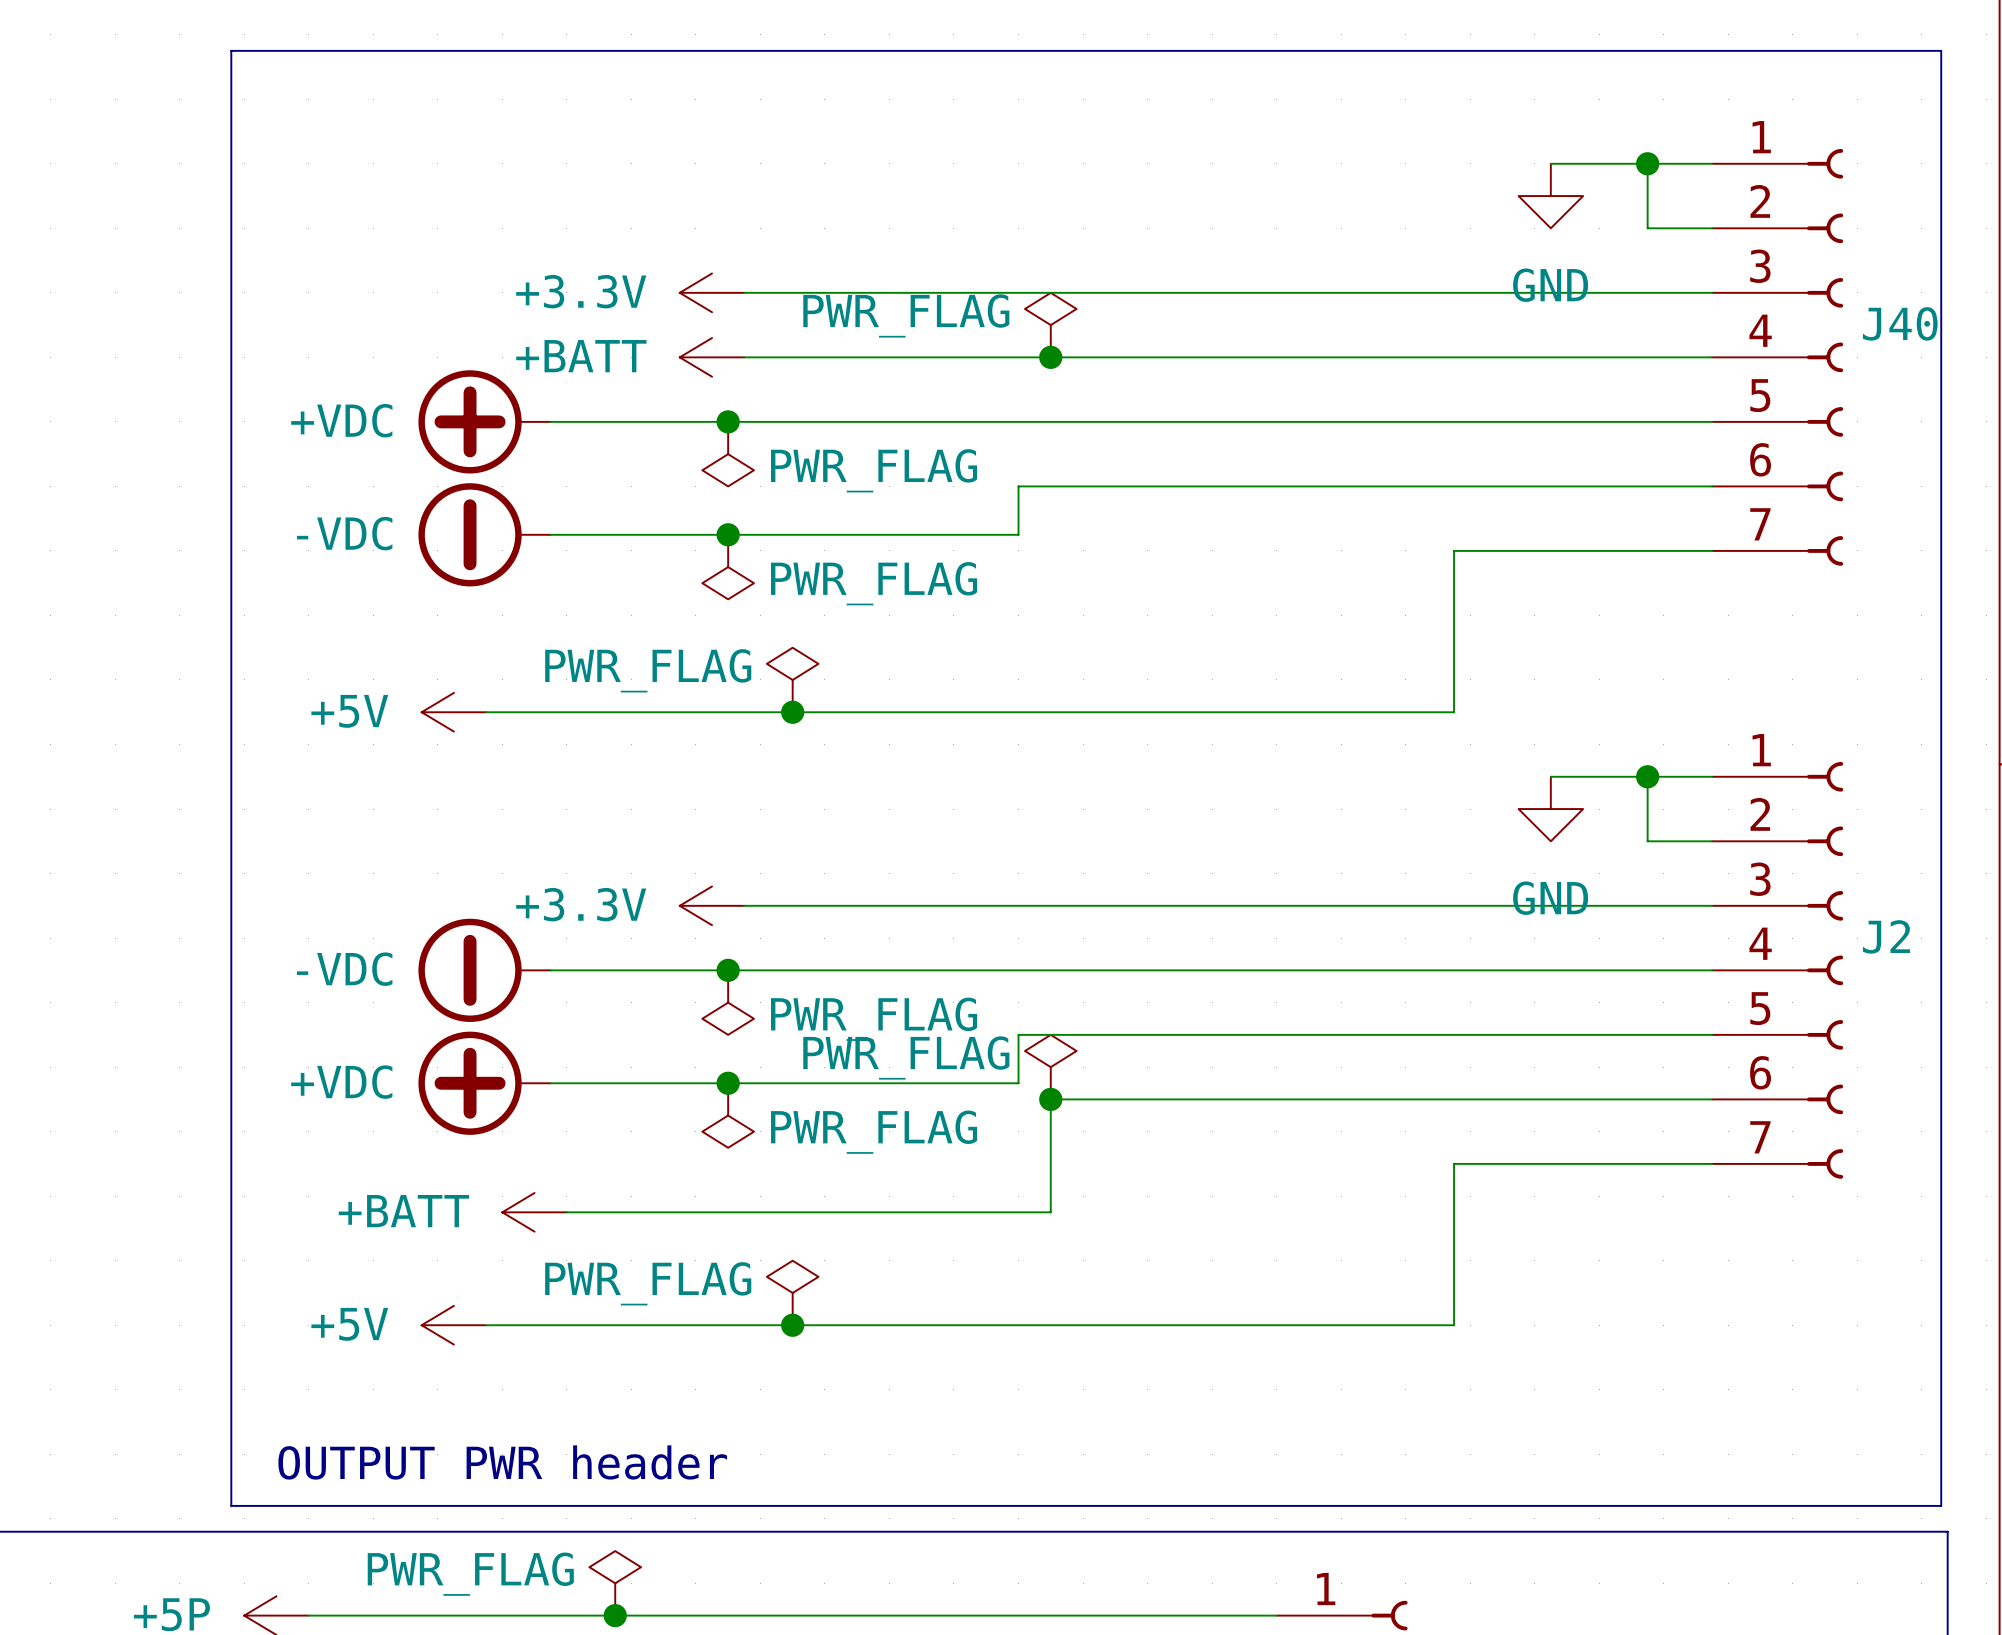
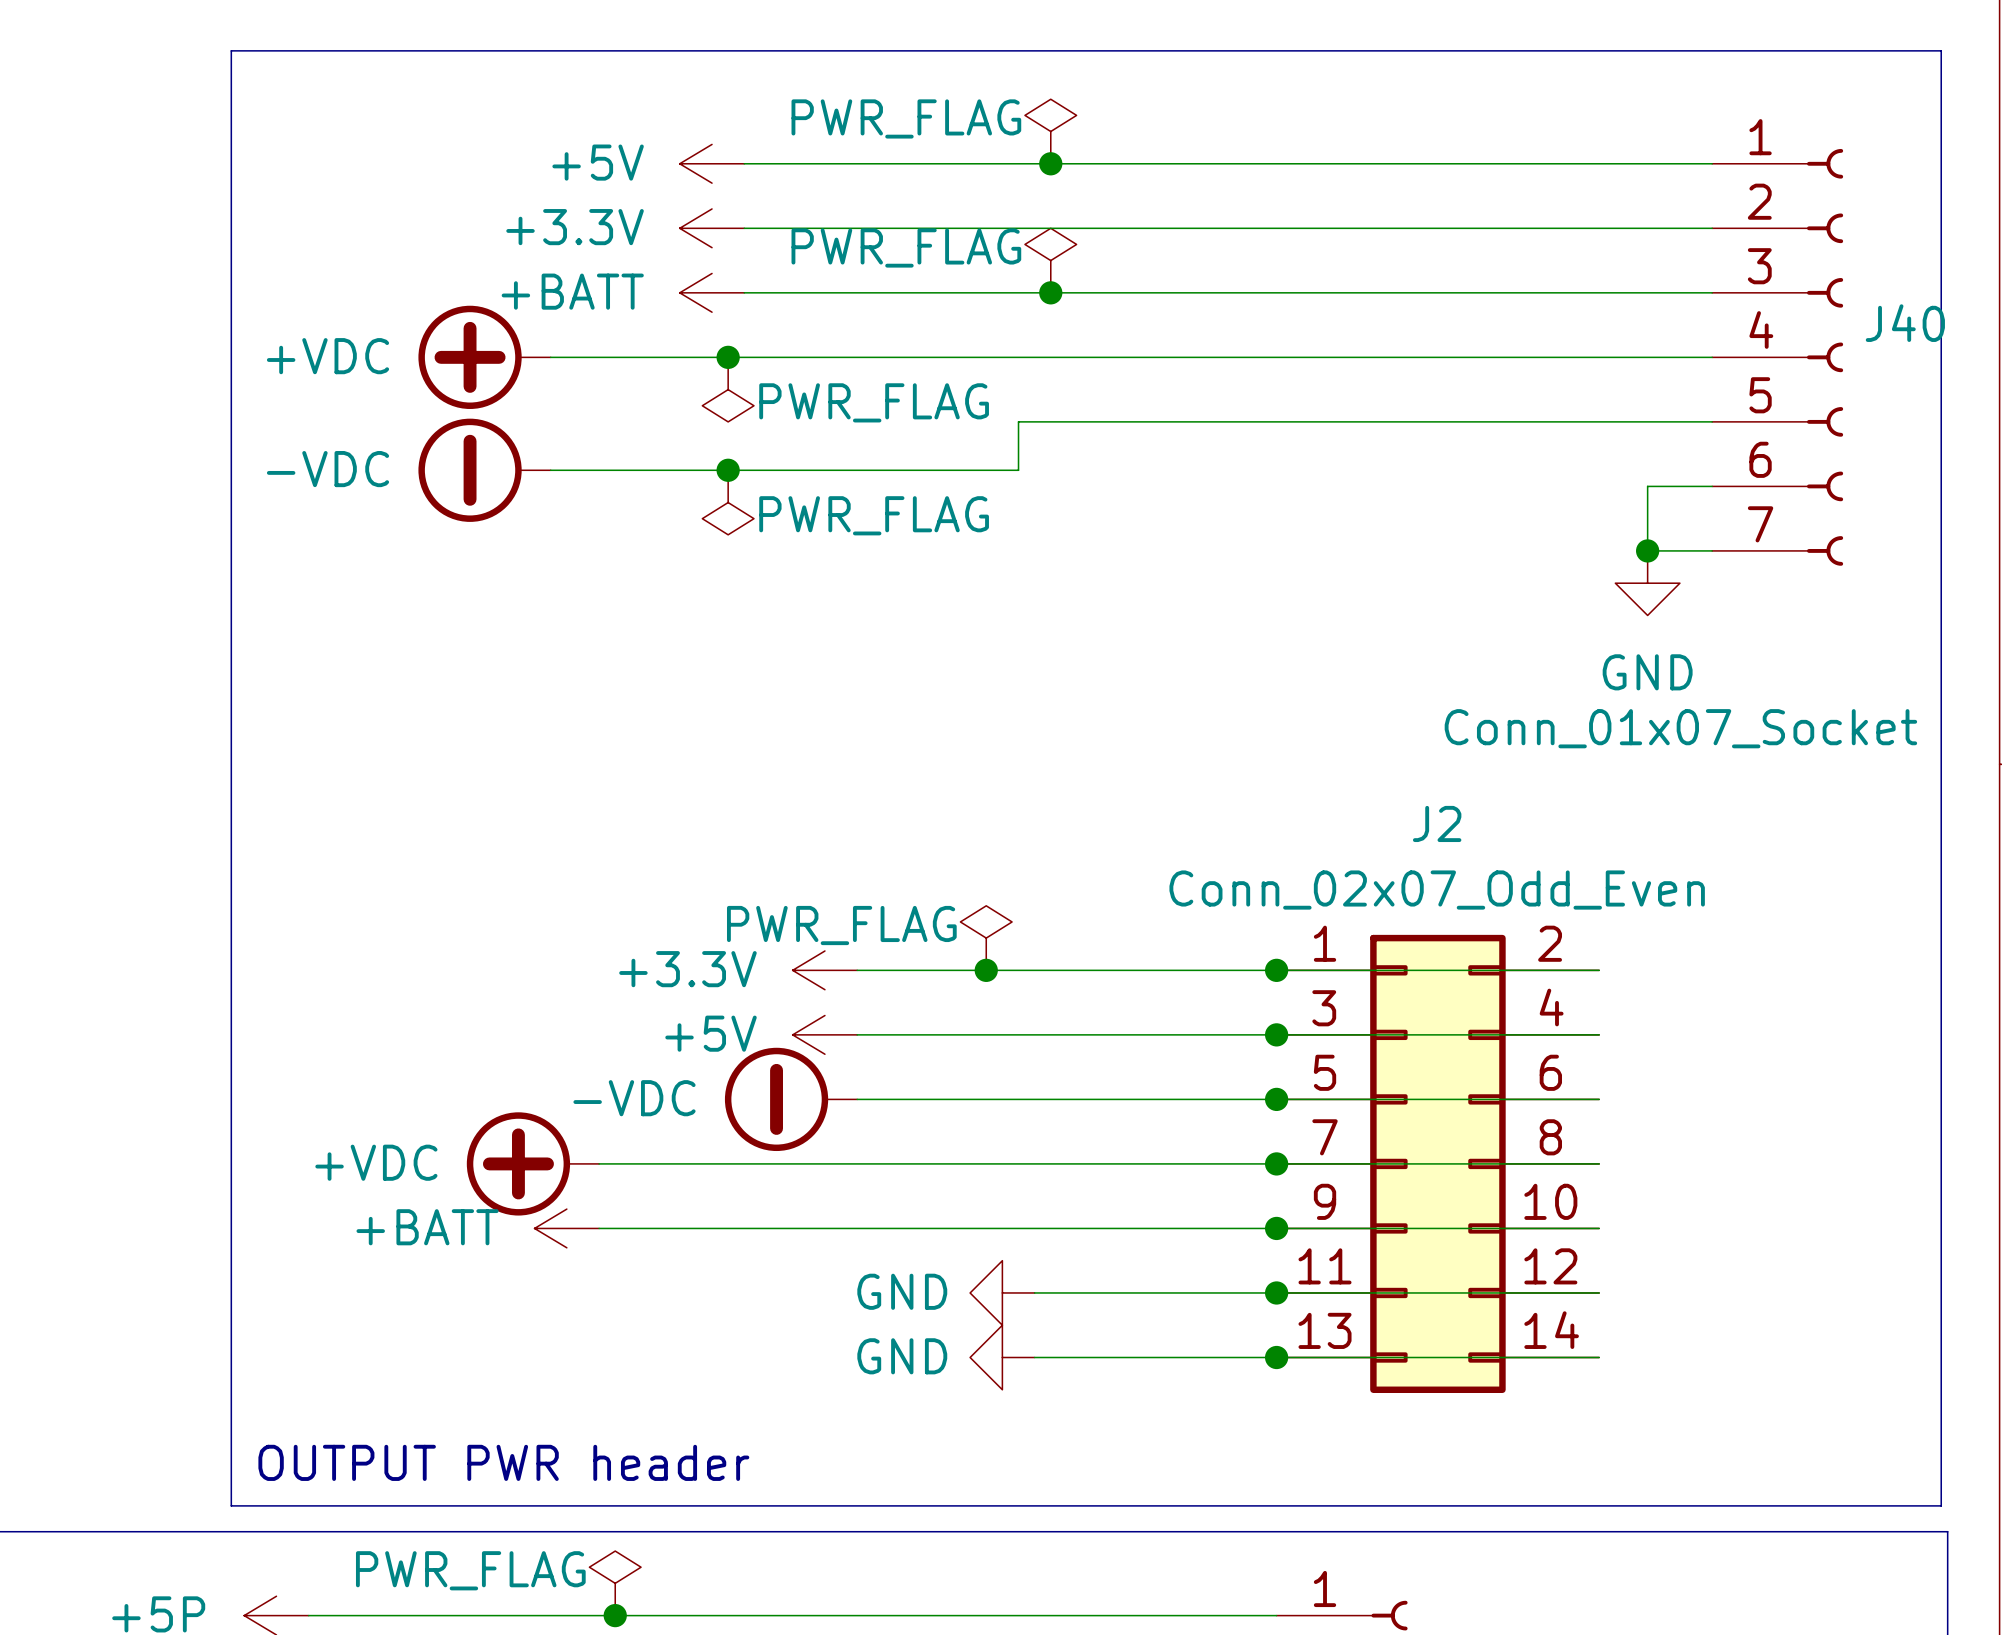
power symbol: none -> PWR_FLAG (1050, 131)
power symbol: none -> +5V (712, 163)
wire: none -> (744, 163) (1550, 163)
junction: none -> (1050, 163)
wire: (1647, 163) (1647, 228) -> (744, 228) (1647, 228)
junction: (1647, 163) -> none
power symbol: GND (1550, 196) -> none
power symbol: none -> +3.3V (712, 228)
power symbol: +3.3V (712, 292) -> +BATT (712, 292)
power symbol position: PWR_FLAG (1050, 325) -> PWR_FLAG (1050, 260)
wire: none -> (550, 357) (744, 357)
power symbol: +BATT (712, 357) -> none
junction: none -> (728, 357)
junction position: (1050, 357) -> (1050, 292)
power symbol: none -> PWR_FLAG (728, 389)
power symbol position: +VDC (484, 421) -> +VDC (484, 357)
wire: (550, 421) (1018, 421) -> (550, 470) (1018, 470) (1018, 421)
junction: (728, 421) -> none
power symbol: PWR_FLAG (728, 454) -> none
junction: none -> (728, 470)
wire: (1647, 486) (1018, 486) (1018, 534) (550, 534) -> (1647, 486) (1647, 550)
power symbol: none -> PWR_FLAG (728, 502)
power symbol position: -VDC (484, 534) -> -VDC (484, 470)
junction: (728, 534) -> none
wire: (1647, 550) (1454, 550) (1454, 712) (486, 712) -> none
junction: none -> (1647, 550)
power symbol: PWR_FLAG (728, 567) -> none
power symbol: none -> GND (1647, 583)
power symbol: PWR_FLAG (792, 679) -> none
power symbol: +5V (453, 712) -> none
junction: (792, 712) -> none
J40 value: none -> Conn_01x07_Socket (1680, 728)
J2 symbol: [1712, 761, 1844, 1179] -> [1276, 934, 1600, 1393]
wire: (1550, 776) (1712, 776) -> none
wire: (1647, 776) (1647, 841) (1712, 841) -> none
junction: (1647, 776) -> none
power symbol: GND (1550, 809) -> none
J2 value: none -> Conn_02x07_Odd_Even (1437, 890)
power symbol position: +3.3V (712, 905) -> +3.3V (824, 970)
wire: (744, 905) (1712, 905) -> none
J2 name position: J2 (1886, 936) -> J2 (1437, 823)
power symbol: none -> PWR_FLAG (986, 938)
power symbol: -VDC (484, 970) -> none
wire: (550, 970) (857, 970) -> none
junction: (728, 970) -> none
junction: none -> (986, 970)
junction: none -> (1276, 970)
wire: (1599, 970) (1712, 970) -> none
power symbol: PWR_FLAG (728, 1002) -> none
power symbol: none -> +5V (824, 1034)
wire: (1018, 1034) (1018, 1083) (550, 1083) -> (1018, 1034) (857, 1034)
junction: none -> (1276, 1034)
wire: (1599, 1034) (1712, 1034) -> none
power symbol: PWR_FLAG (1050, 1067) -> none
power symbol position: +VDC (484, 1083) -> +VDC (532, 1163)
junction: (728, 1083) -> none
power symbol: none -> -VDC (791, 1099)
wire: (1050, 1099) (1050, 1212) (566, 1212) -> (1050, 1099) (857, 1099)
junction: (1050, 1099) -> none
junction: none -> (1276, 1099)
wire: (1599, 1099) (1712, 1099) -> none
power symbol: PWR_FLAG (728, 1115) -> none
junction: none -> (1276, 1163)
wire: (1454, 1163) (1454, 1325) (486, 1325) -> (1454, 1163) (599, 1163)
wire: (1599, 1163) (1712, 1163) -> none
power symbol position: +BATT (534, 1212) -> +BATT (566, 1228)
wire: none -> (599, 1228) (1599, 1228)
junction: none -> (1276, 1228)
power symbol: PWR_FLAG (792, 1292) -> none
power symbol: none -> GND (1002, 1292)
wire: none -> (1034, 1292) (1599, 1292)
junction: none -> (1276, 1292)
power symbol: +5V (453, 1325) -> none
junction: (792, 1325) -> none
power symbol: none -> GND (1002, 1357)
wire: none -> (1034, 1357) (1599, 1357)
junction: none -> (1276, 1357)

